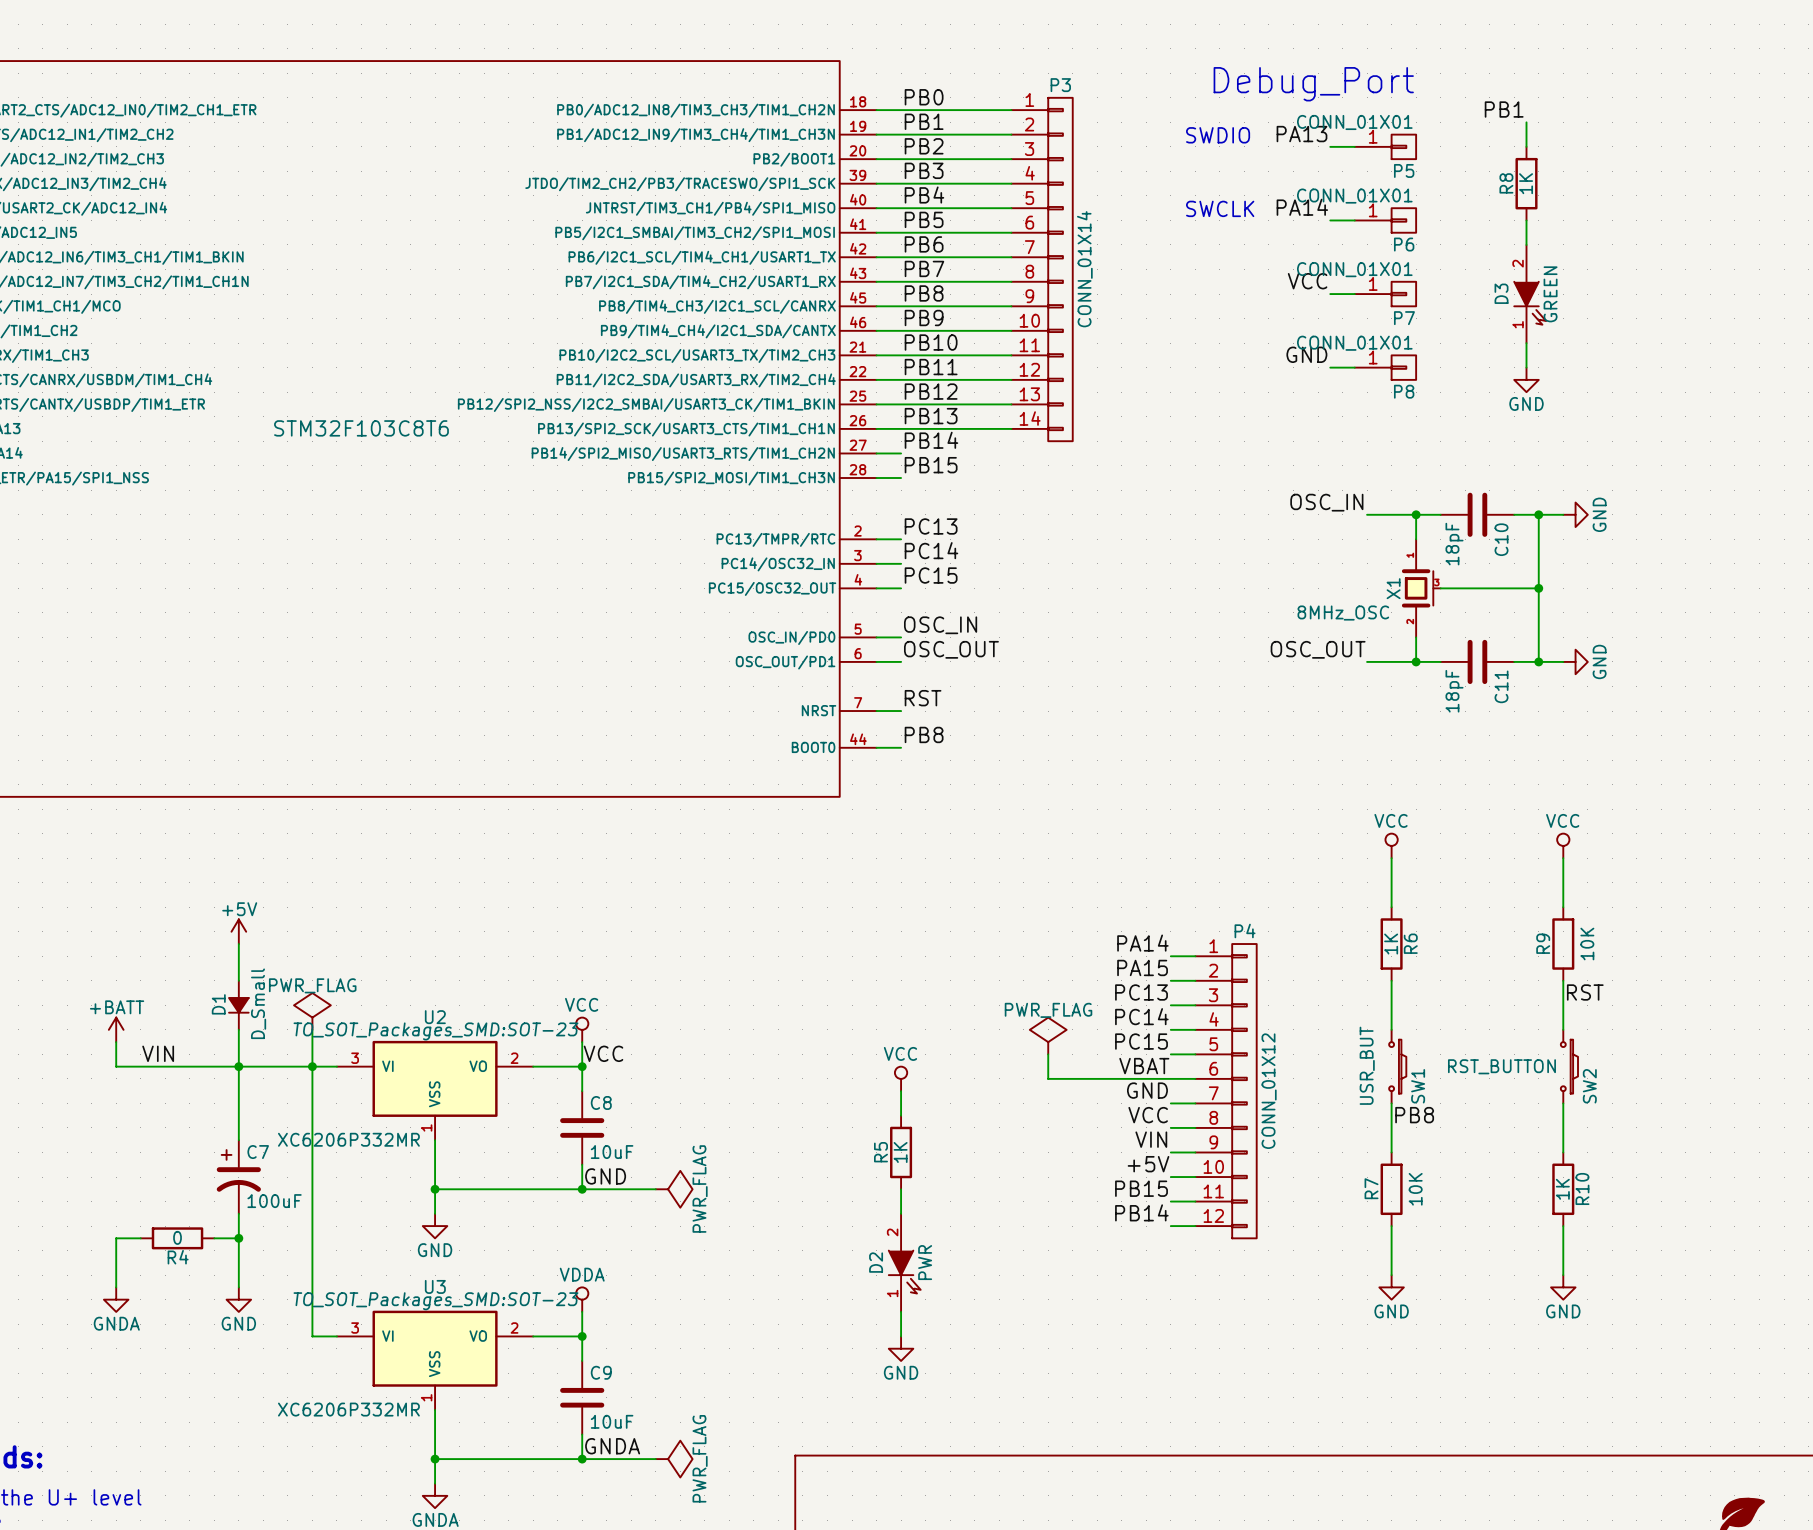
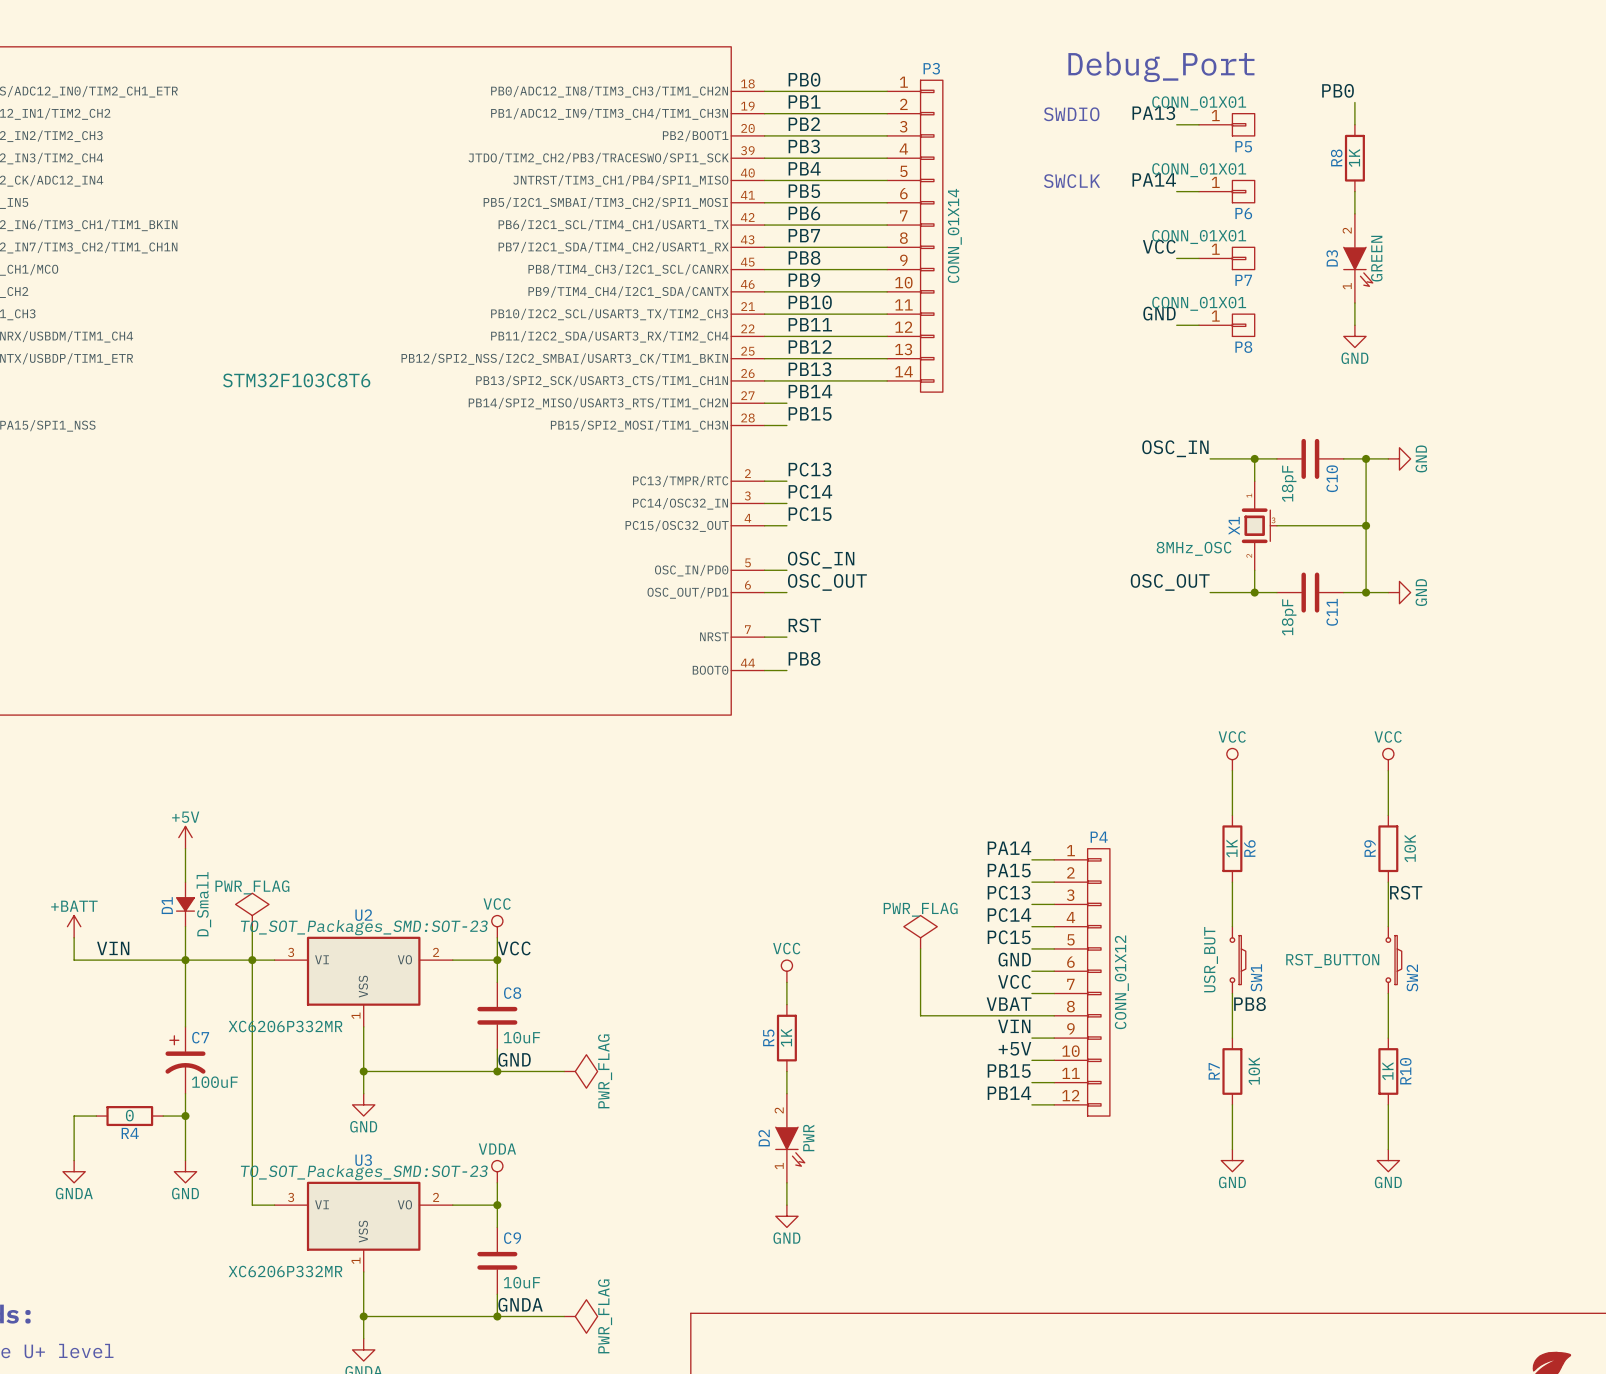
label: PB1 (1504, 109) -> PB0 (1338, 90)
label: VBAT (1144, 1066) -> GND (1014, 959)
wire: (1048, 1078) (1170, 1078) -> (920, 971) (920, 1015) (1031, 1015)
label: GND (1147, 1090) -> VCC (1014, 981)
label: VCC (1148, 1115) -> VBAT (1009, 1004)

